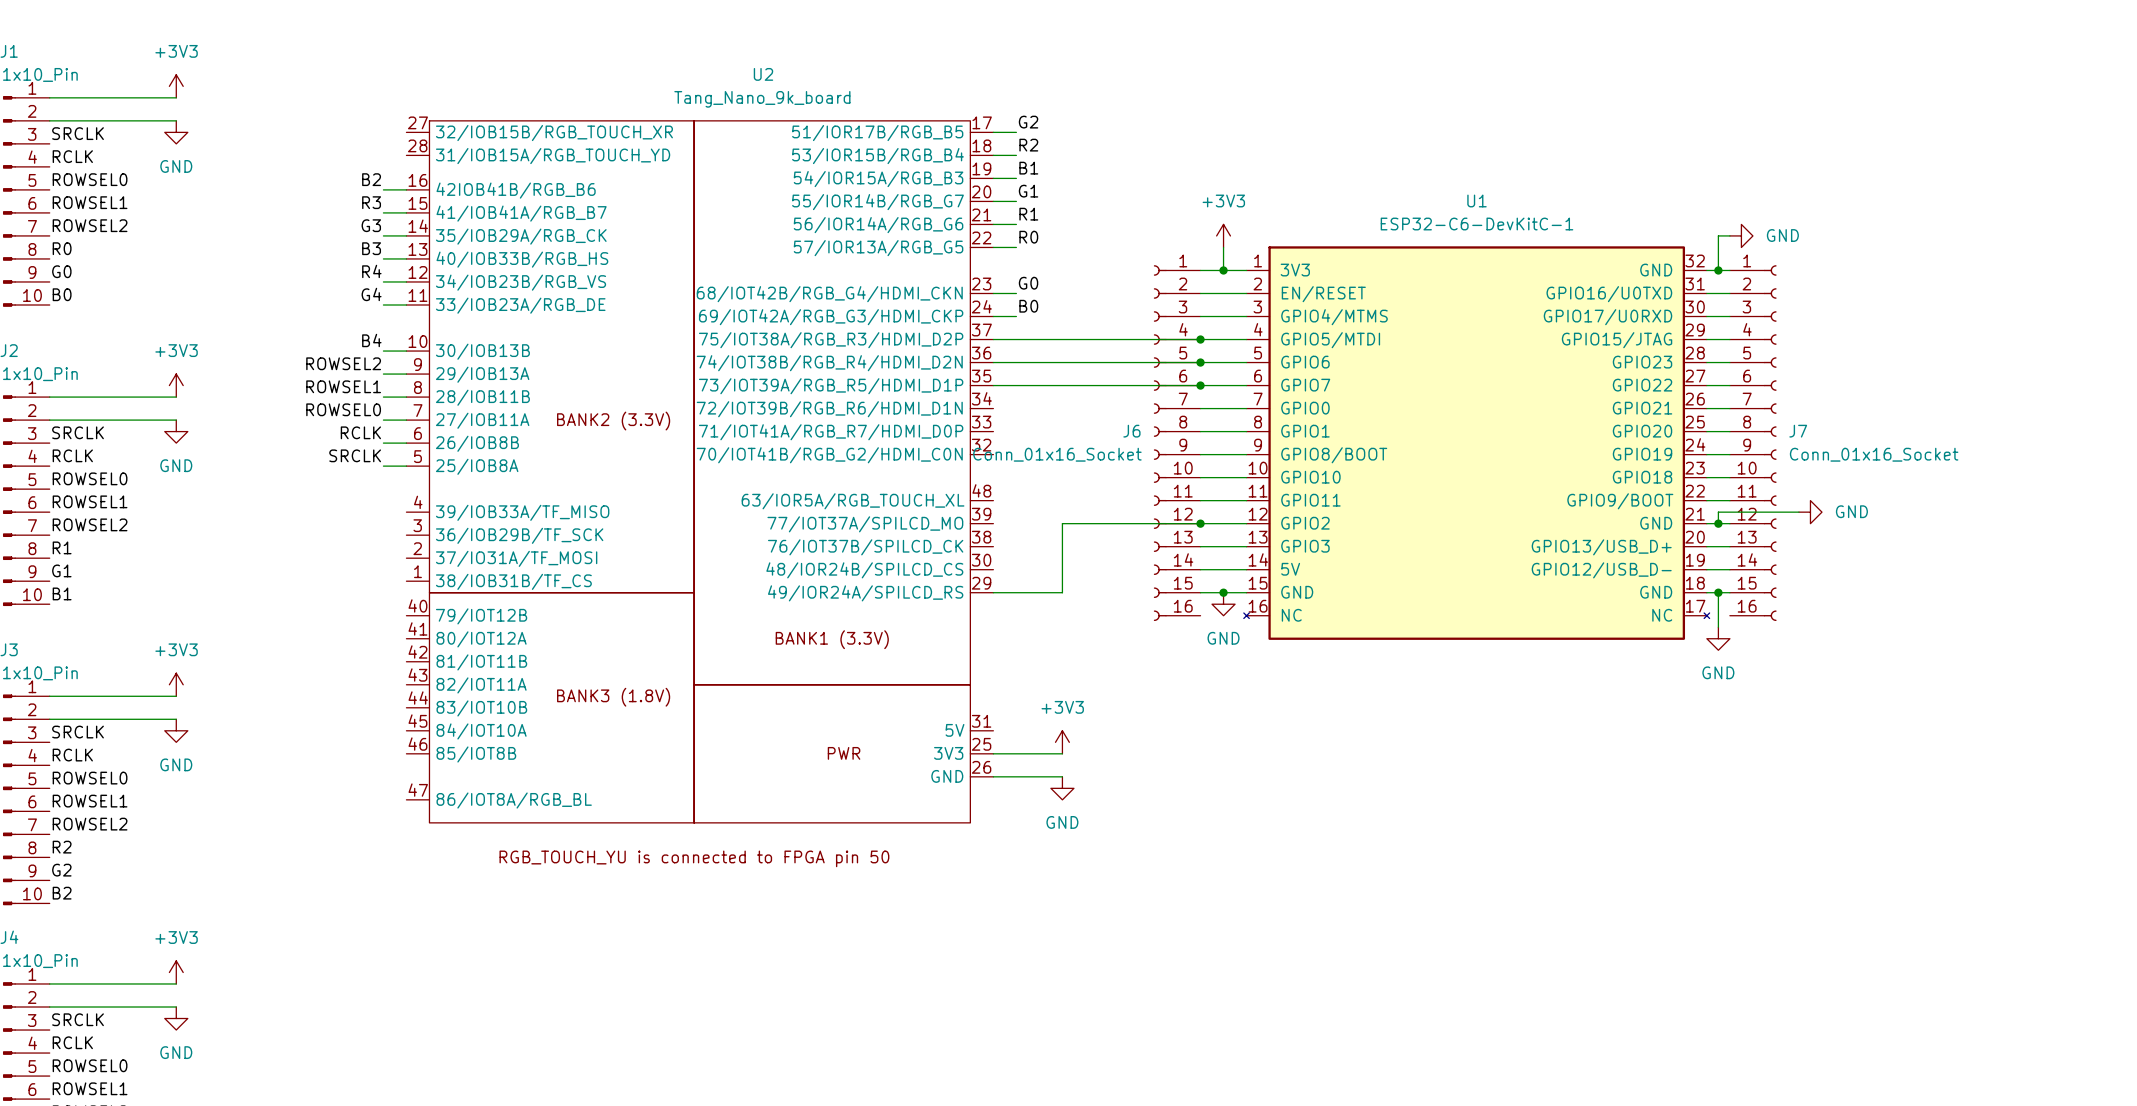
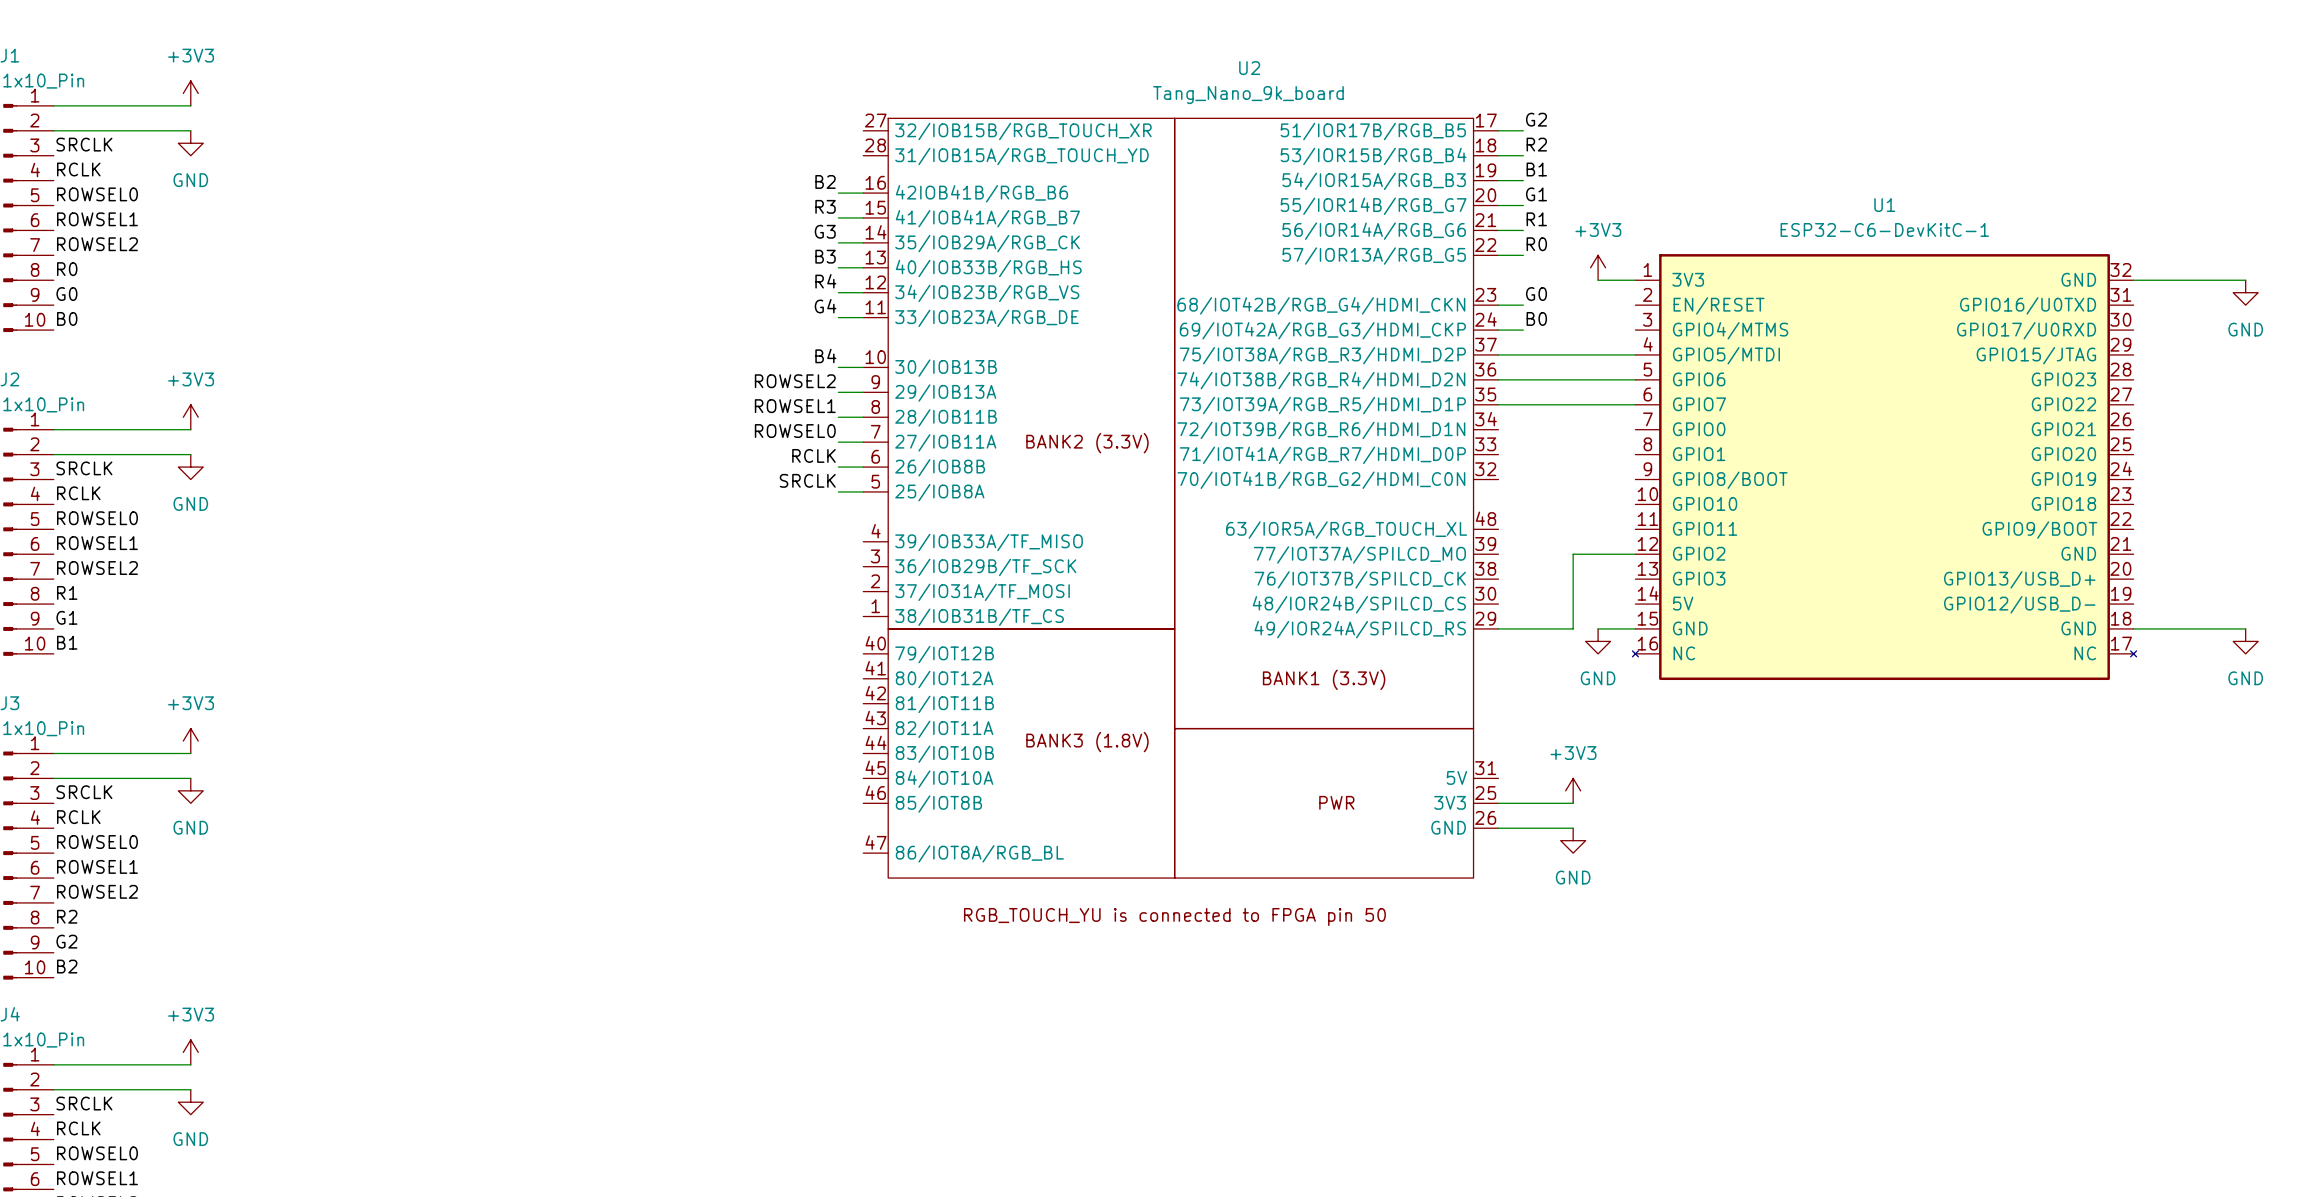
label: none -> G2 (1536, 119)
wire: none -> (1498, 130) (1523, 130)
label: G2 (1028, 122) -> none
wire: (993, 132) (1016, 132) -> (838, 193) (863, 193)
label: none -> R2 (1536, 144)
wire: none -> (1498, 155) (1523, 155)
label: R2 (1028, 145) -> none
wire: (993, 155) (1016, 155) -> (838, 217) (863, 217)
label: none -> B1 (1536, 169)
wire: none -> (1498, 180) (1523, 180)
label: none -> B2 (825, 181)
label: B1 (1028, 168) -> none
wire: (993, 178) (1016, 178) -> (838, 242) (863, 242)
label: B2 (371, 179) -> none
label: none -> G1 (1536, 194)
wire: (383, 189) (406, 189) -> none
wire: none -> (1498, 205) (1523, 205)
label: none -> R3 (825, 206)
label: G1 (1028, 191) -> none
wire: (993, 201) (1016, 201) -> (838, 267) (863, 267)
label: R3 (371, 202) -> none
label: none -> R1 (1536, 219)
wire: (383, 212) (406, 212) -> none
wire: none -> (1498, 230) (1523, 230)
label: none -> G3 (825, 231)
label: R1 (1028, 214) -> none
wire: (993, 224) (1016, 224) -> (838, 292) (863, 292)
label: G3 (371, 225) -> none
label: none -> R0 (1536, 244)
wire: (383, 235) (406, 235) -> none
power symbol: +3V3 (1223, 235) -> none
wire: none -> (1498, 255) (1523, 255)
power symbol: GND (1741, 235) -> none
label: none -> B3 (825, 256)
label: R0 (1028, 237) -> none
wire: (993, 247) (1016, 247) -> (838, 317) (863, 317)
wire: (1223, 247) (1223, 270) -> none
power symbol: none -> +3V3 (1598, 267)
label: B3 (371, 248) -> none
wire: (383, 258) (406, 258) -> none
wire: none -> (2133, 280) (2245, 280)
label: none -> R4 (825, 281)
wire: (1200, 270) (1246, 270) -> none
junction: (1223, 270) -> none
junction: (1718, 270) -> none
power symbol: none -> GND (2245, 292)
label: R4 (371, 271) -> none
label: none -> G0 (1536, 294)
wire: (383, 281) (406, 281) -> none
label: none -> G4 (825, 306)
label: G0 (1028, 283) -> none
wire: (993, 293) (1016, 293) -> (838, 367) (863, 367)
wire: (1200, 293) (1246, 293) -> none
label: G4 (371, 294) -> none
label: none -> B0 (1536, 318)
wire: (383, 305) (406, 305) -> none
label: B0 (1028, 306) -> none
wire: (993, 316) (1016, 316) -> (838, 392) (863, 392)
wire: (1200, 316) (1246, 316) -> none
label: none -> B4 (825, 356)
wire: (993, 339) (1246, 339) -> none
junction: (1200, 339) -> none
label: B4 (371, 340) -> none
wire: (383, 351) (406, 351) -> none
label: none -> ROWSEL2 (795, 381)
wire: (993, 362) (1246, 362) -> none
junction: (1200, 362) -> none
label: ROWSEL2 (343, 363) -> none
wire: (383, 374) (406, 374) -> none
label: none -> ROWSEL1 (795, 406)
wire: none -> (838, 417) (863, 417)
wire: (993, 385) (1246, 385) -> none
junction: (1200, 385) -> none
label: ROWSEL1 (343, 386) -> none
wire: (383, 397) (406, 397) -> none
label: none -> ROWSEL0 (795, 431)
wire: none -> (838, 442) (863, 442)
wire: (1200, 408) (1246, 408) -> none
label: ROWSEL0 (343, 409) -> none
wire: (383, 420) (406, 420) -> none
label: none -> RCLK (813, 455)
wire: none -> (838, 467) (863, 467)
wire: (1200, 431) (1246, 431) -> none
label: RCLK (360, 432) -> none
wire: (383, 443) (406, 443) -> none
J6: Conn_01x16_Socket (1177, 443) -> none
U1 position: (1476, 443) -> (1884, 467)
J7: Conn_01x16_Socket (1753, 443) -> none
label: none -> SRCLK (807, 480)
wire: none -> (838, 491) (863, 491)
wire: (1200, 454) (1246, 454) -> none
label: SRCLK (355, 455) -> none
wire: (383, 466) (406, 466) -> none
U2 position: (751, 471) -> (1236, 498)
wire: (1200, 477) (1246, 477) -> none
wire: (1200, 500) (1246, 500) -> none
power symbol: GND (1810, 512) -> none
junction: (1200, 523) -> none
wire: (1246, 523) (1062, 523) (1062, 592) (993, 592) -> none
junction: (1718, 523) -> none
wire: (1200, 546) (1246, 546) -> none
wire: (1200, 569) (1246, 569) -> none
wire: none -> (2133, 628) (2245, 628)
wire: (1200, 592) (1246, 592) -> none
junction: (1223, 592) -> none
power symbol: none -> GND (1598, 641)
junction: (1718, 592) -> none
power symbol: none -> GND (2245, 641)
power symbol: GND (1223, 604) -> none
power symbol: GND (1718, 638) -> none
power symbol: none -> +3V3 (1573, 790)
power symbol: +3V3 (1062, 742) -> none
wire: none -> (1498, 803) (1573, 803)
wire: (993, 753) (1062, 753) -> none
wire: none -> (1498, 828) (1573, 828)
wire: (993, 776) (1062, 776) -> none
power symbol: none -> GND (1573, 840)
power symbol: GND (1062, 788) -> none

